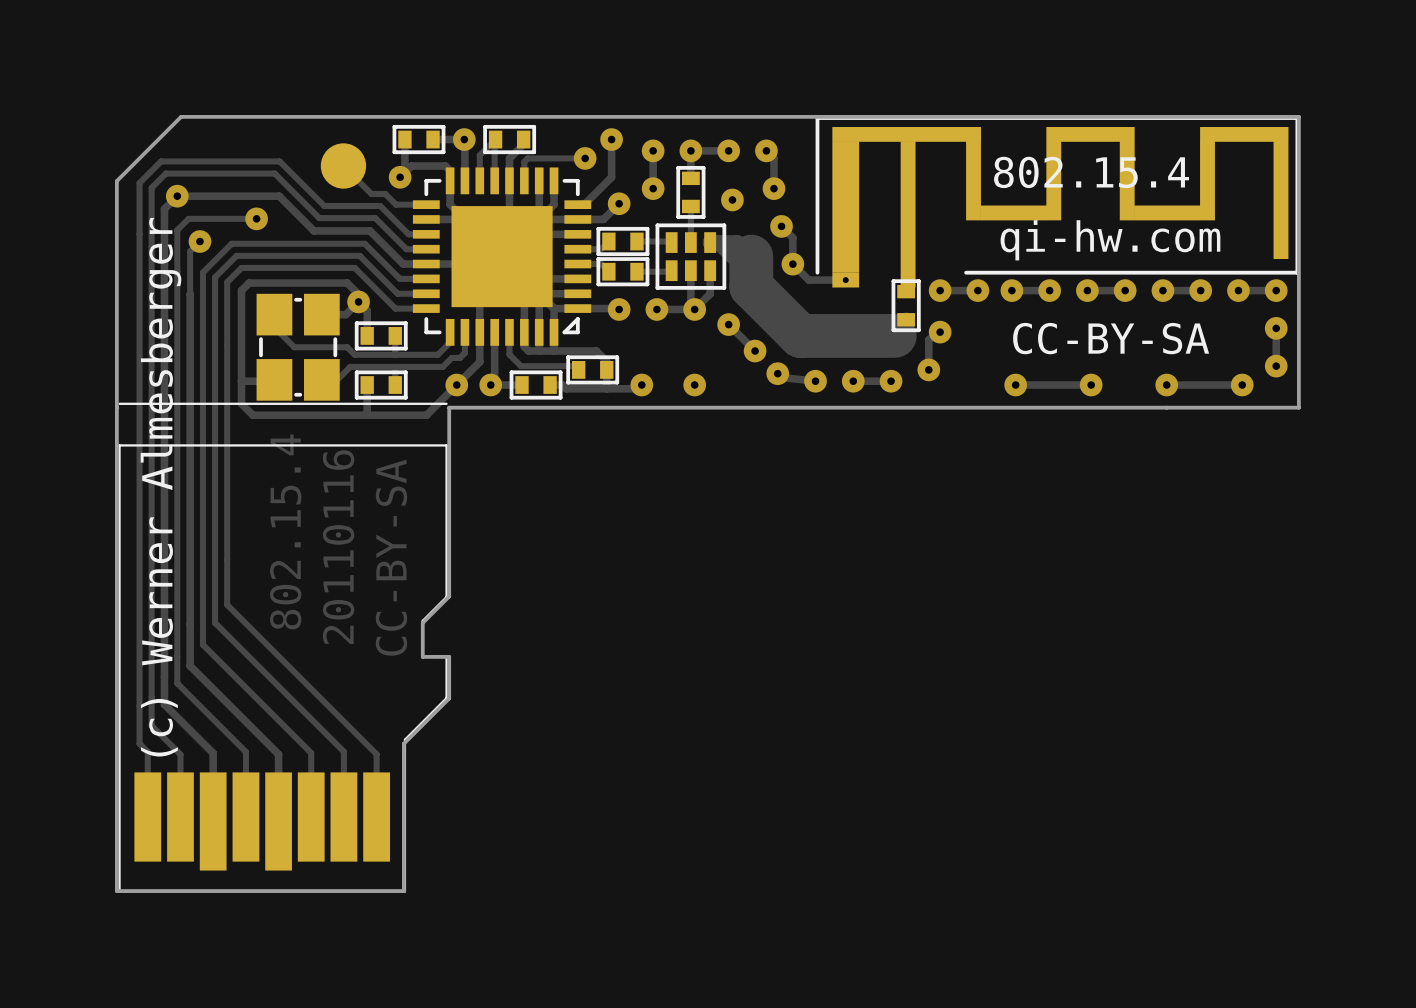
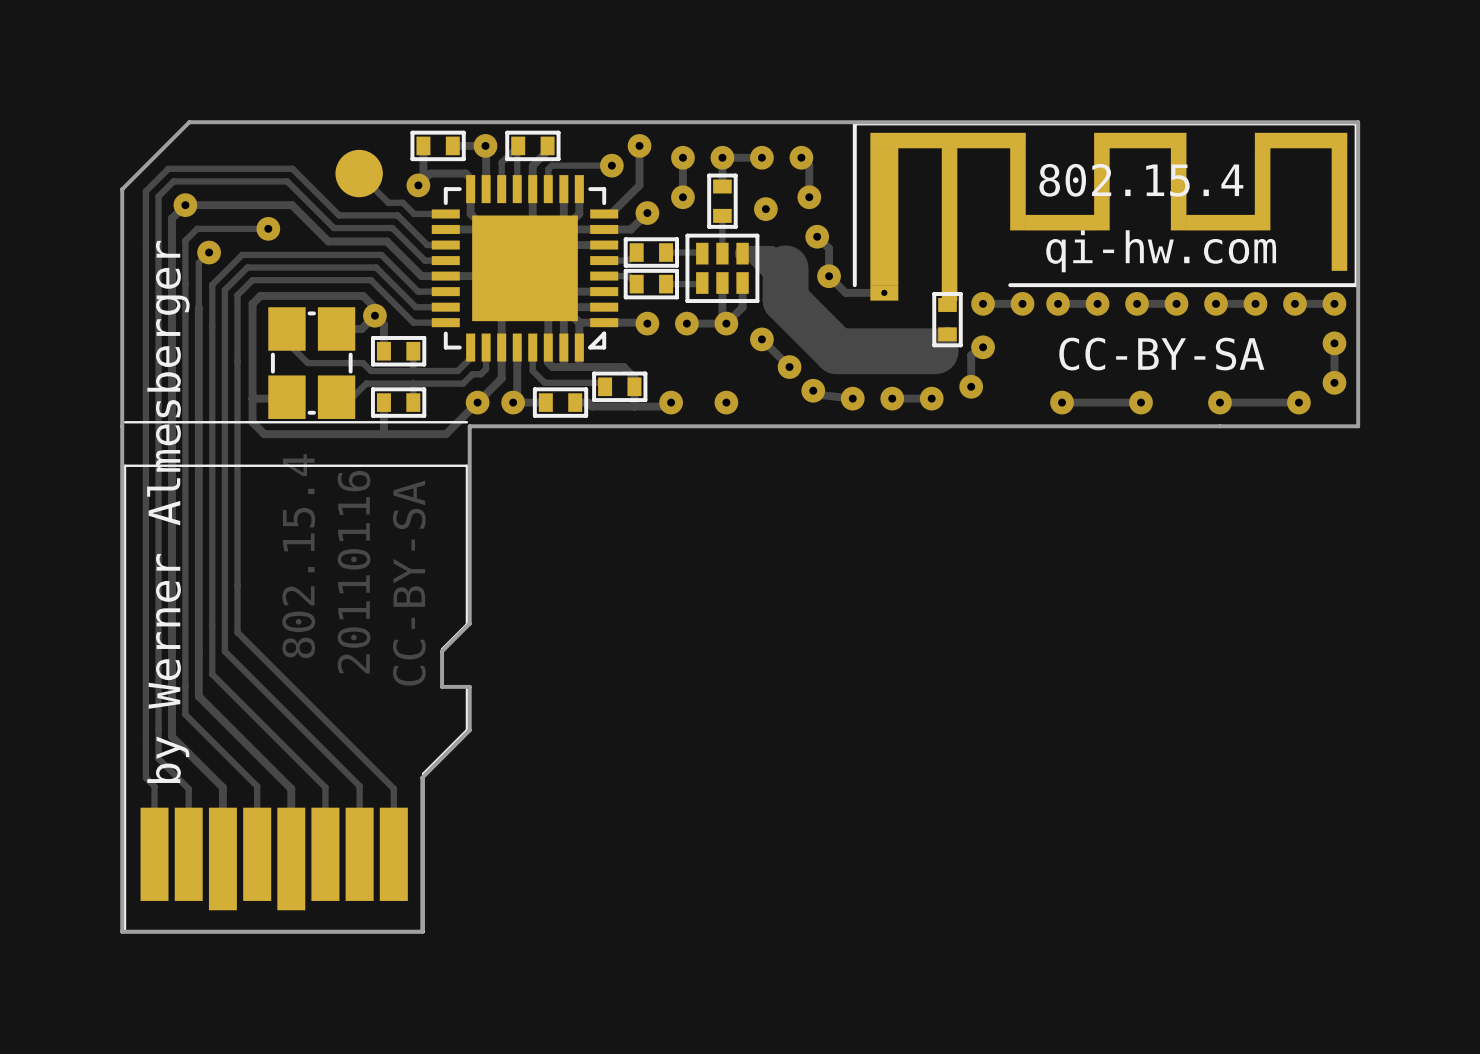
text: (c) Werner Almesberger (161, 487) -> by Werner Almesberger (168, 511)

